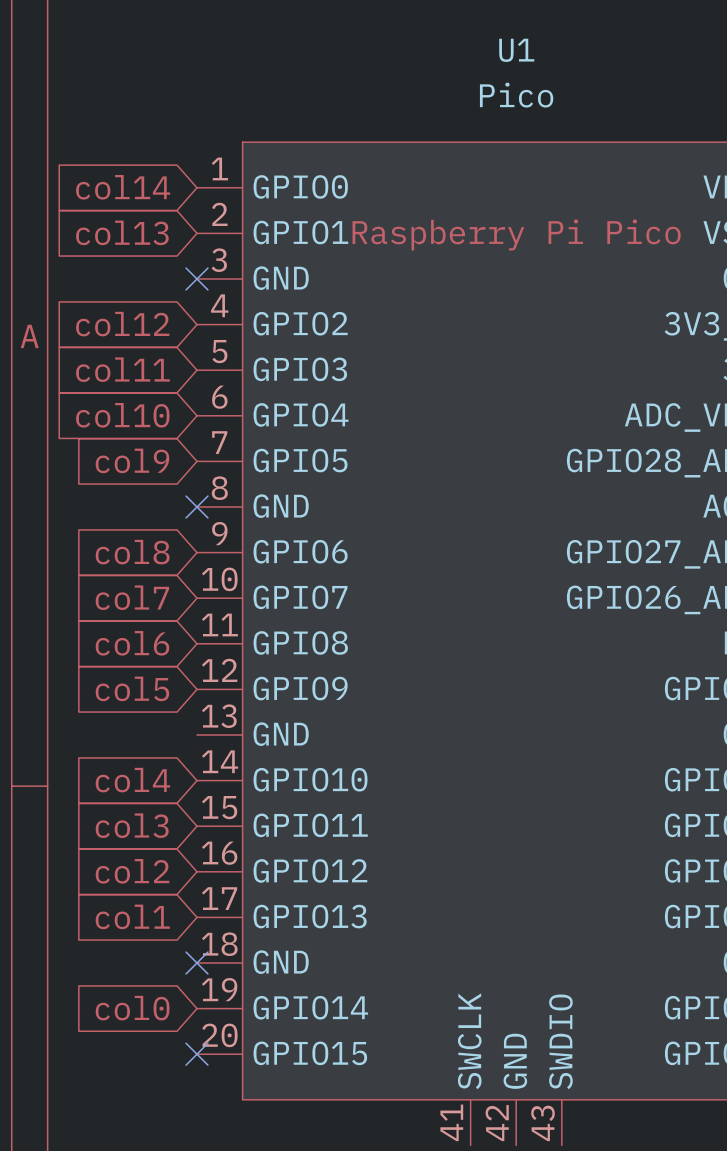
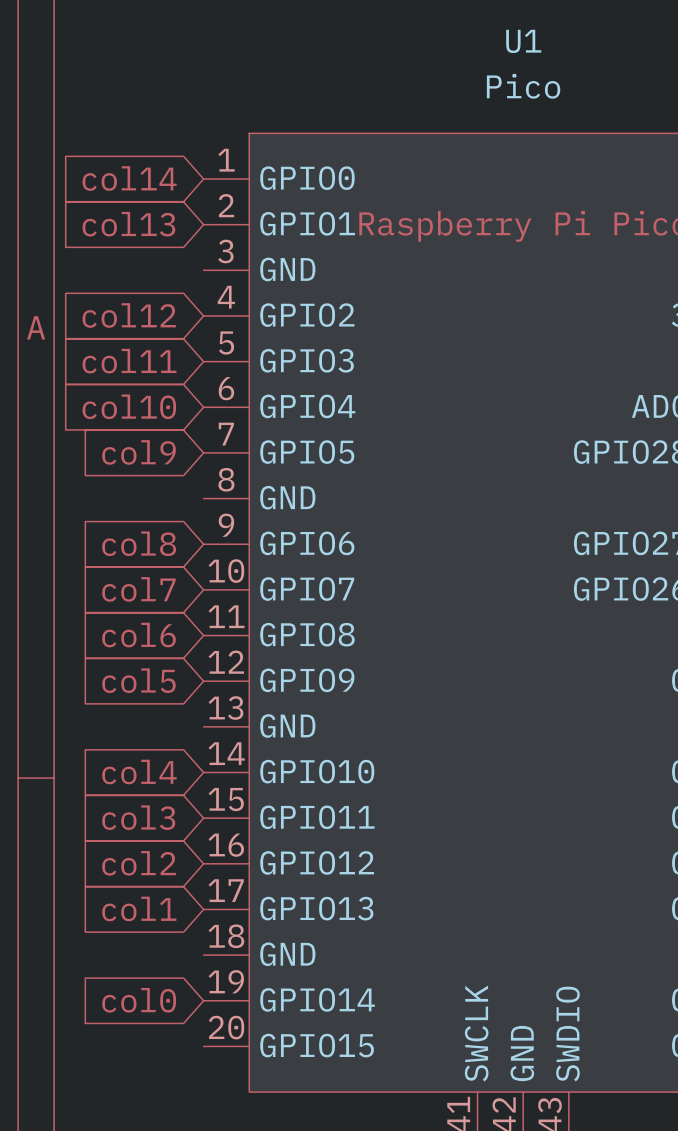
no-connect mark: (197, 278) -> none
no-connect mark: (197, 506) -> none
no-connect mark: (197, 963) -> none
no-connect mark: (197, 1054) -> none

